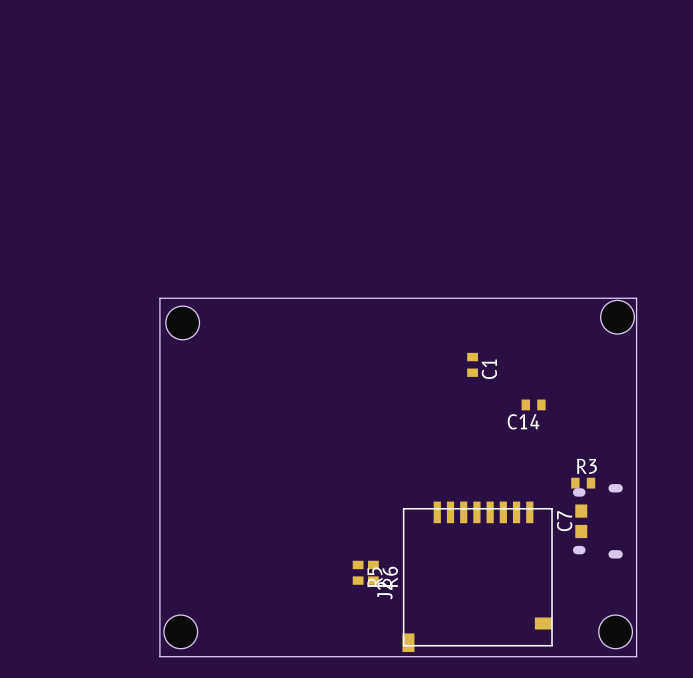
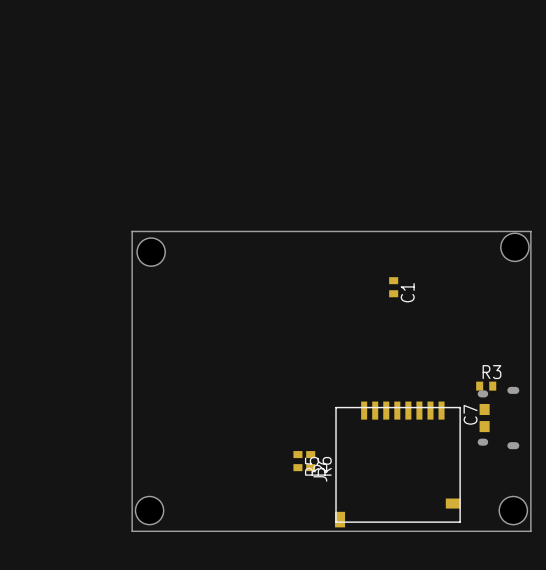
C14: (533, 404) -> none

